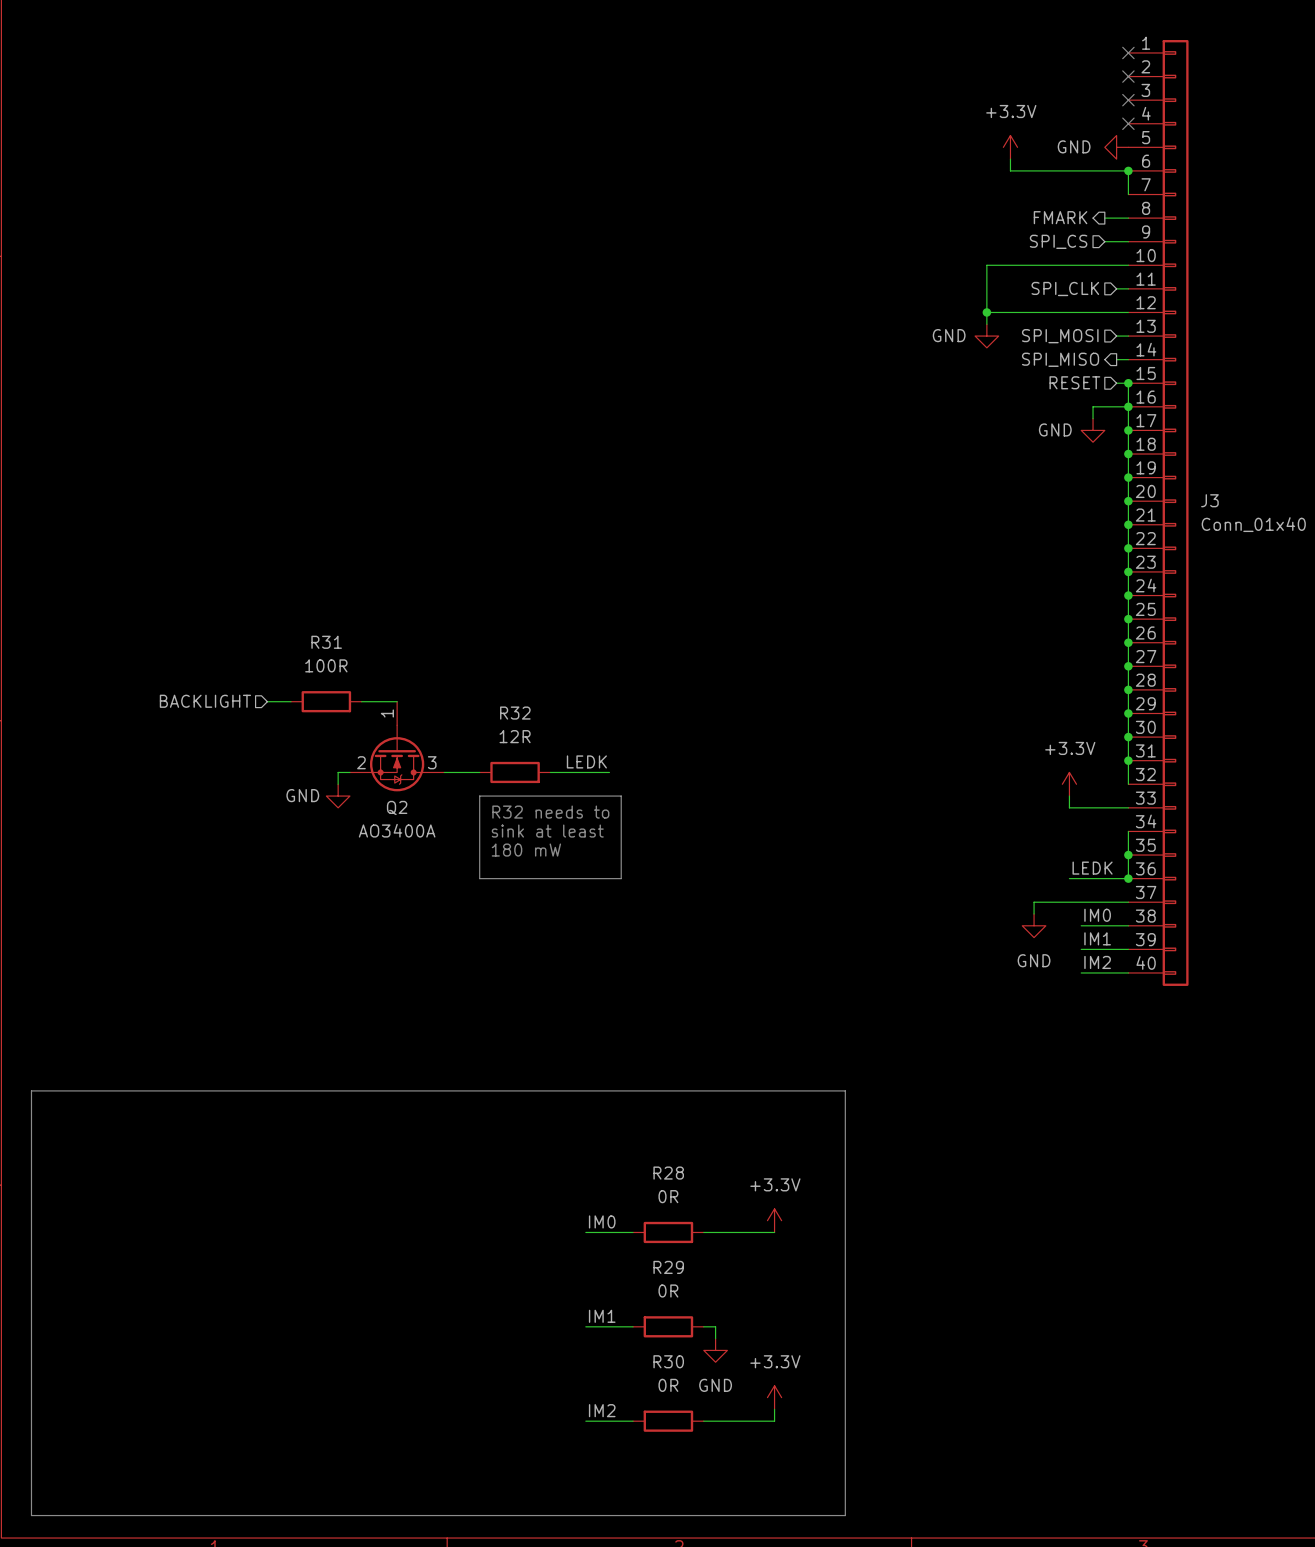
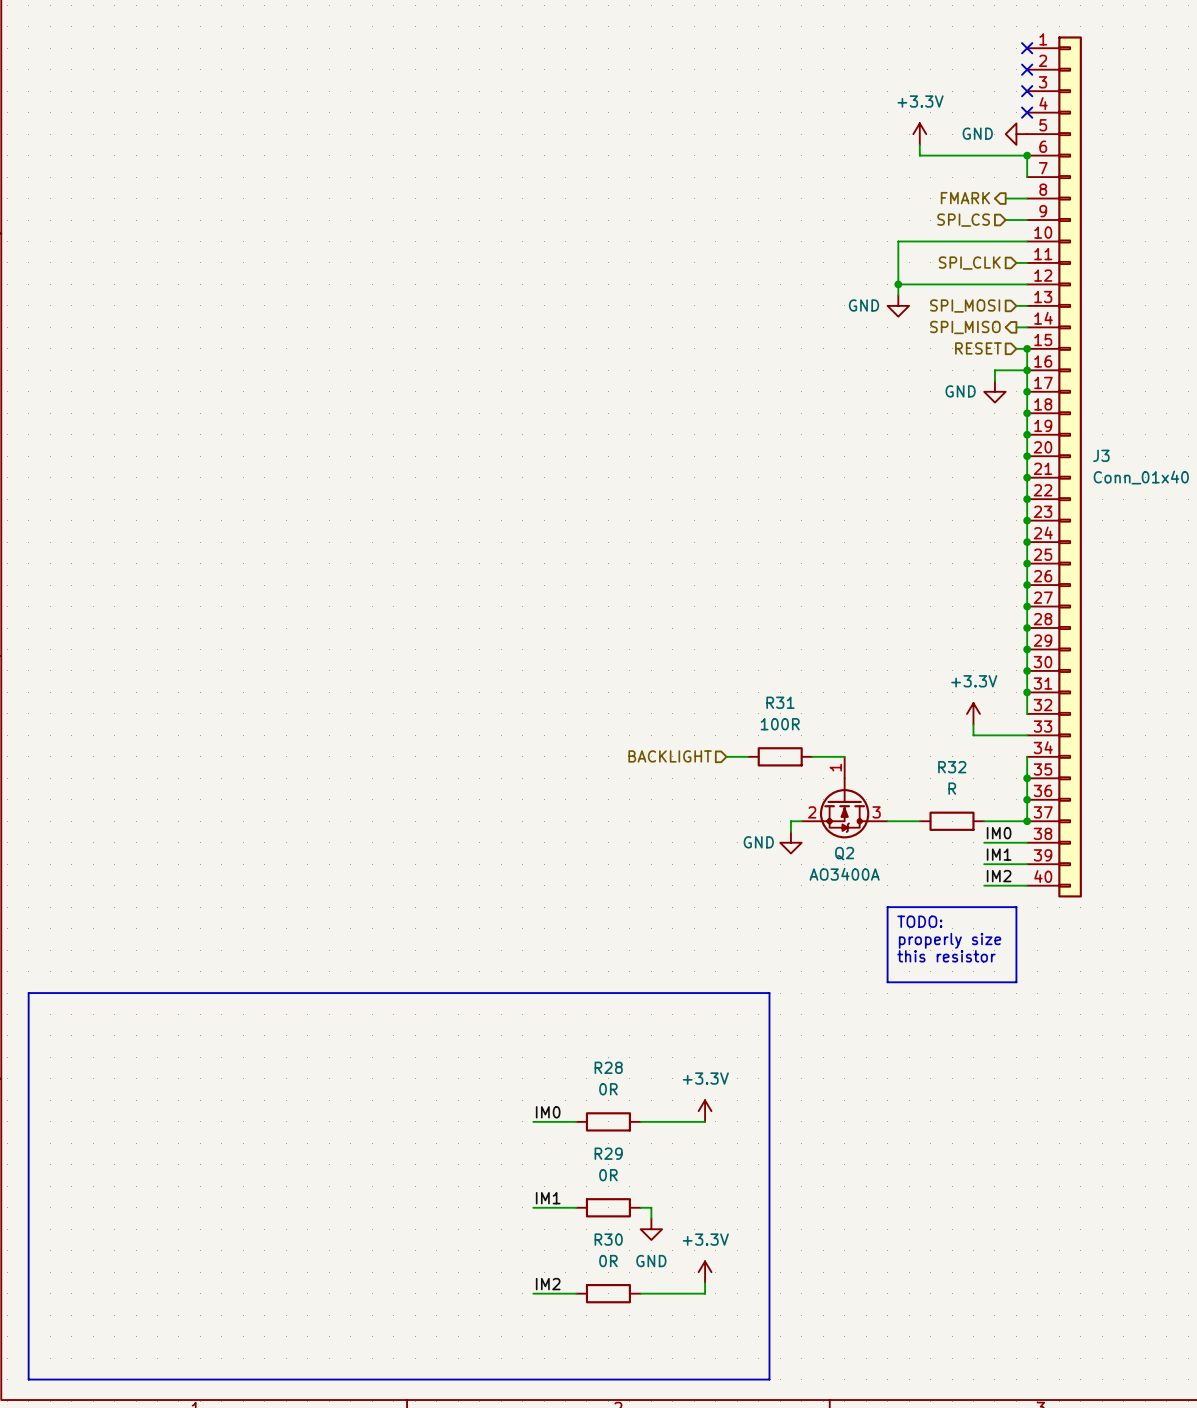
hierarchical label: BACKLIGHT (205, 701) -> none
wire: (267, 701) (290, 701) -> none
R31 position: (326, 701) -> (780, 756)
wire: (361, 701) (397, 701) -> none
R32 value: 12R (515, 736) -> R (952, 788)
Q2 position: (397, 746) -> (844, 797)
label: LEDK (586, 761) -> none
wire: (349, 772) (338, 772) (338, 784) -> none
wire: (444, 772) (479, 772) -> none
R32 position: (515, 772) -> (952, 821)
wire: (550, 772) (609, 772) -> none
power symbol: GND (338, 796) -> none
line: (479, 796) (621, 796) (621, 878) (479, 878) (479, 796) -> none
text: R32 needs to (550, 812) -> none
text: sink at least (547, 831) -> none
hierarchical label: none -> BACKLIGHT (670, 756)
wire: none -> (726, 756) (748, 756)
wire: none -> (812, 756) (844, 756)
text: 180 mW (526, 850) -> none
label: LEDK (1092, 868) -> none
wire: (1069, 878) (1128, 878) -> (1027, 821) (1027, 799)
wire: none -> (801, 821) (790, 821) (790, 831)
wire: none -> (887, 821) (919, 821)
wire: (1081, 902) (1034, 902) (1034, 914) -> none
junction: none -> (1027, 821)
power symbol position: GND (1034, 925) -> GND (790, 842)
power symbol text position: GND (1034, 960) -> GND (758, 842)
line: none -> (887, 907) (1016, 907) (1016, 982) (887, 982) (887, 907)
text: none -> TODO: (919, 921)
text: none -> properly size (950, 940)
text: none -> this resistor (946, 956)

